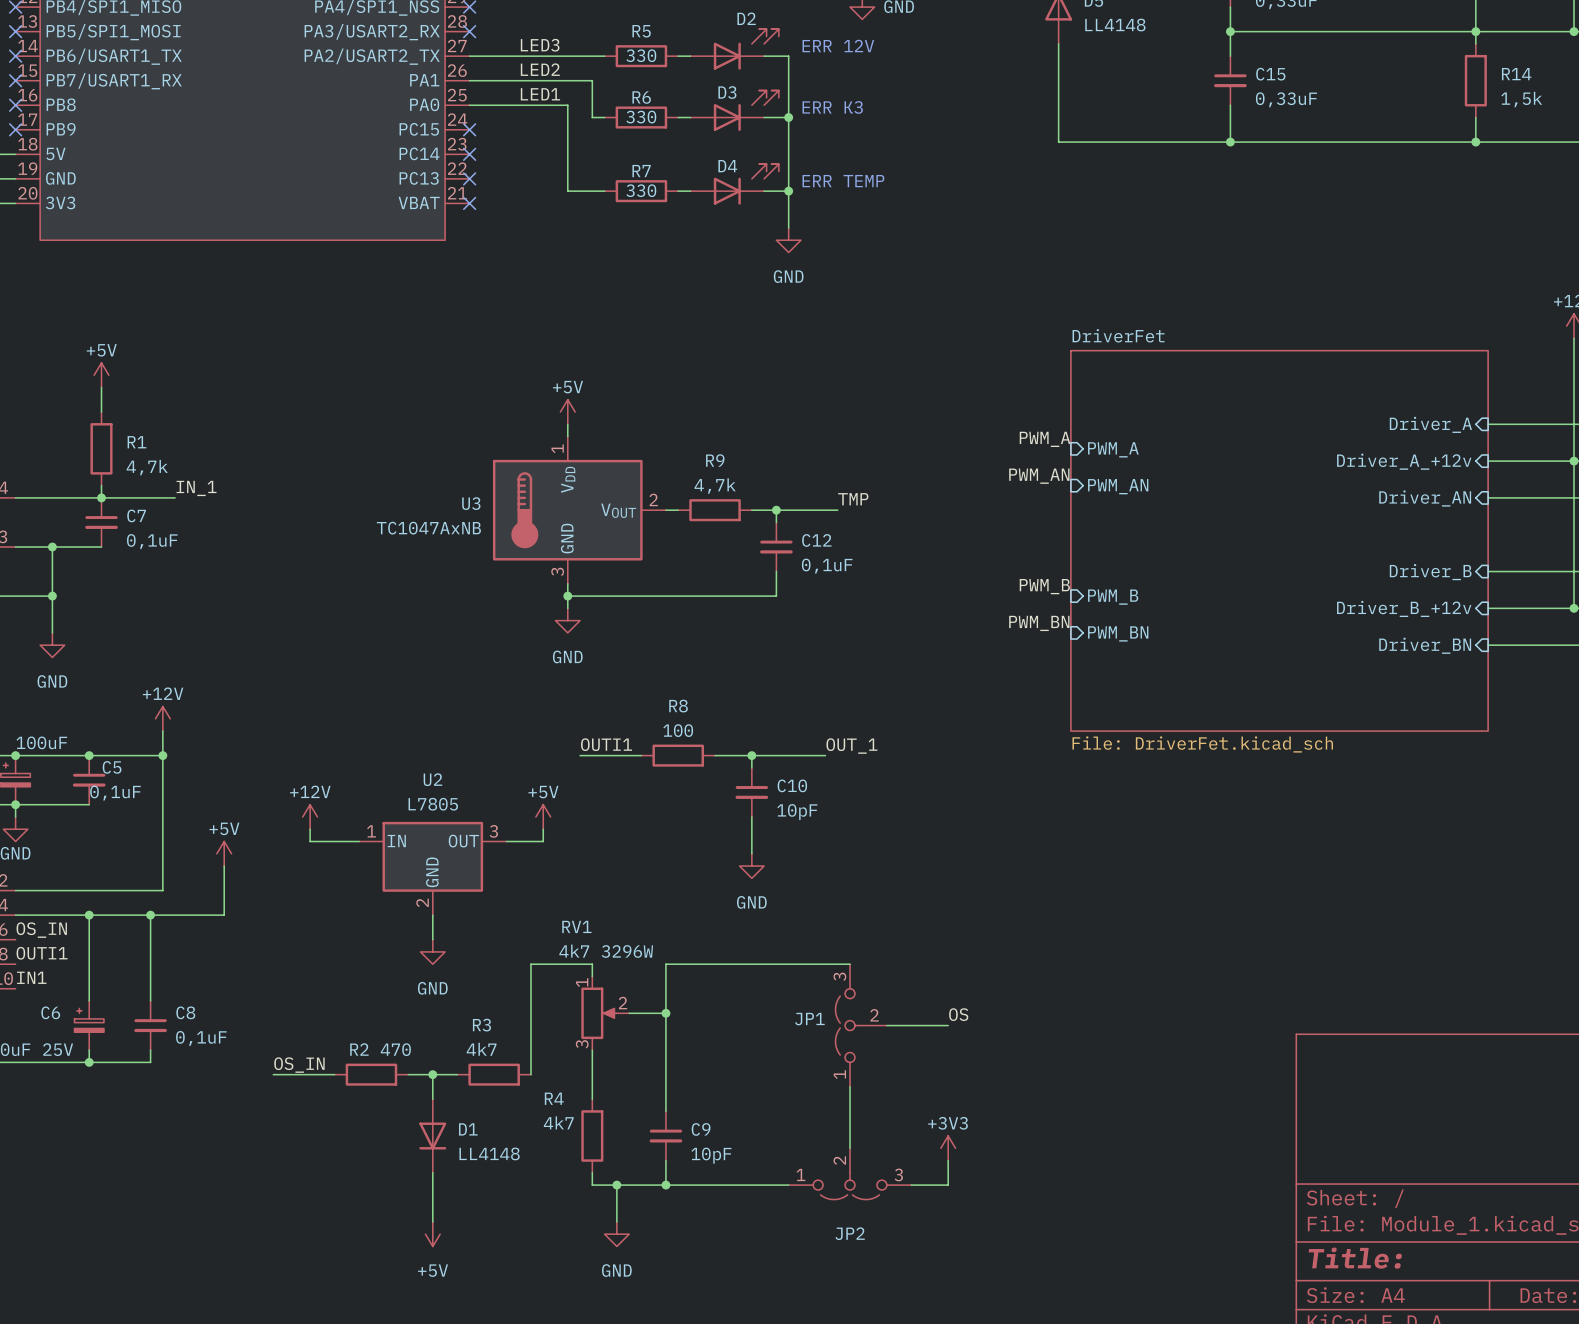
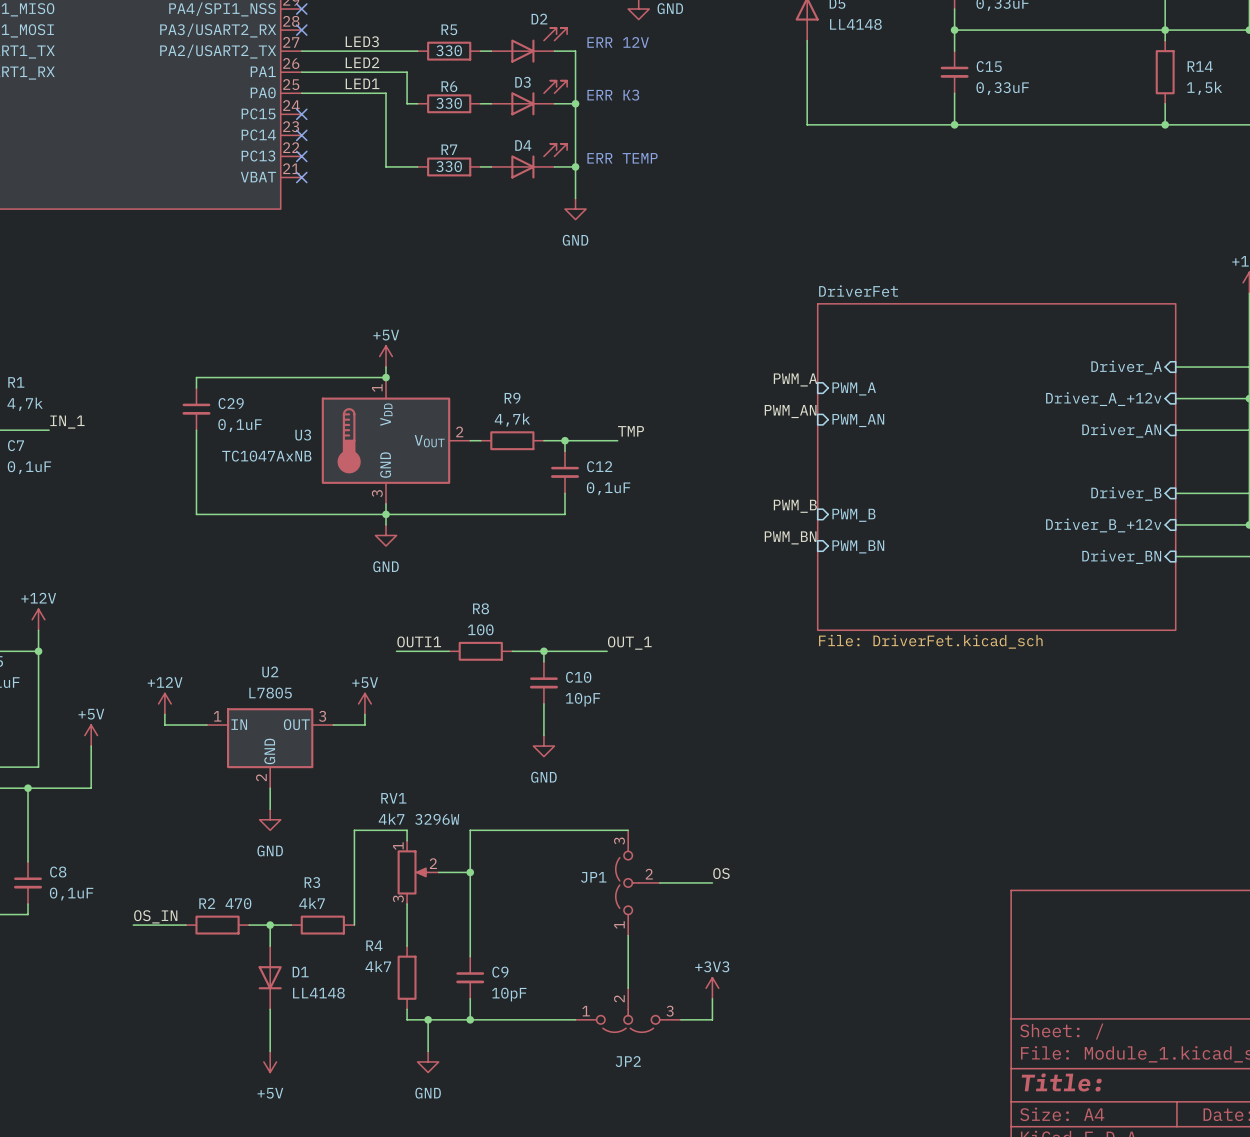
wire: none -> (386, 377) (196, 377) (196, 388)
junction: none -> (386, 377)
C29: none -> 0,1uF (196, 409)
wire: none -> (196, 430) (196, 514) (386, 514)

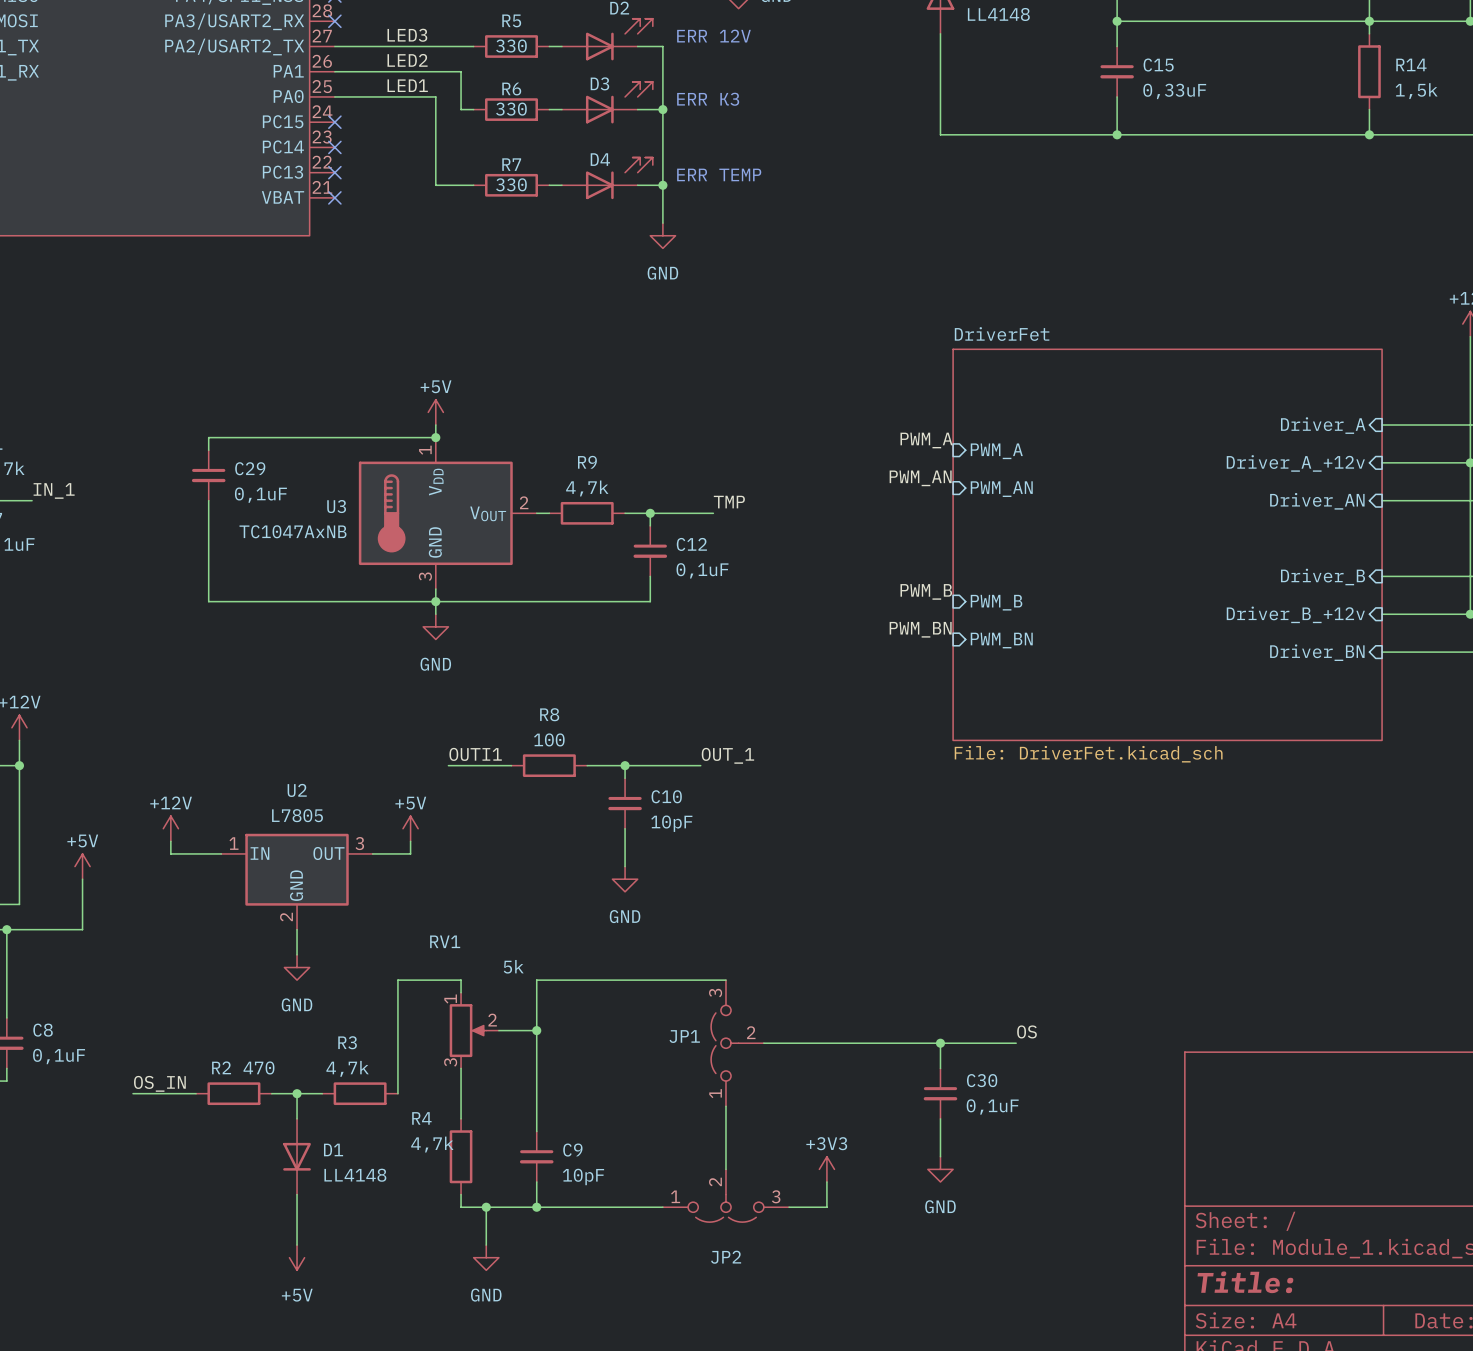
RV1 value: 4k7 3296W (418, 819) -> 5k (513, 966)
label position: OS (721, 873) -> OS (1027, 1031)
wire: none -> (826, 1043) (1016, 1043)
wire: none -> (940, 1043) (940, 1068)
junction: none -> (940, 1043)
R3 value: 4k7 (312, 903) -> 4,7k (347, 1068)
C30: none -> 0,1uF (940, 1093)
wire: none -> (940, 1118) (940, 1156)
R4 value: 4k7 (378, 966) -> 4,7k (432, 1144)
power symbol: none -> GND (940, 1169)

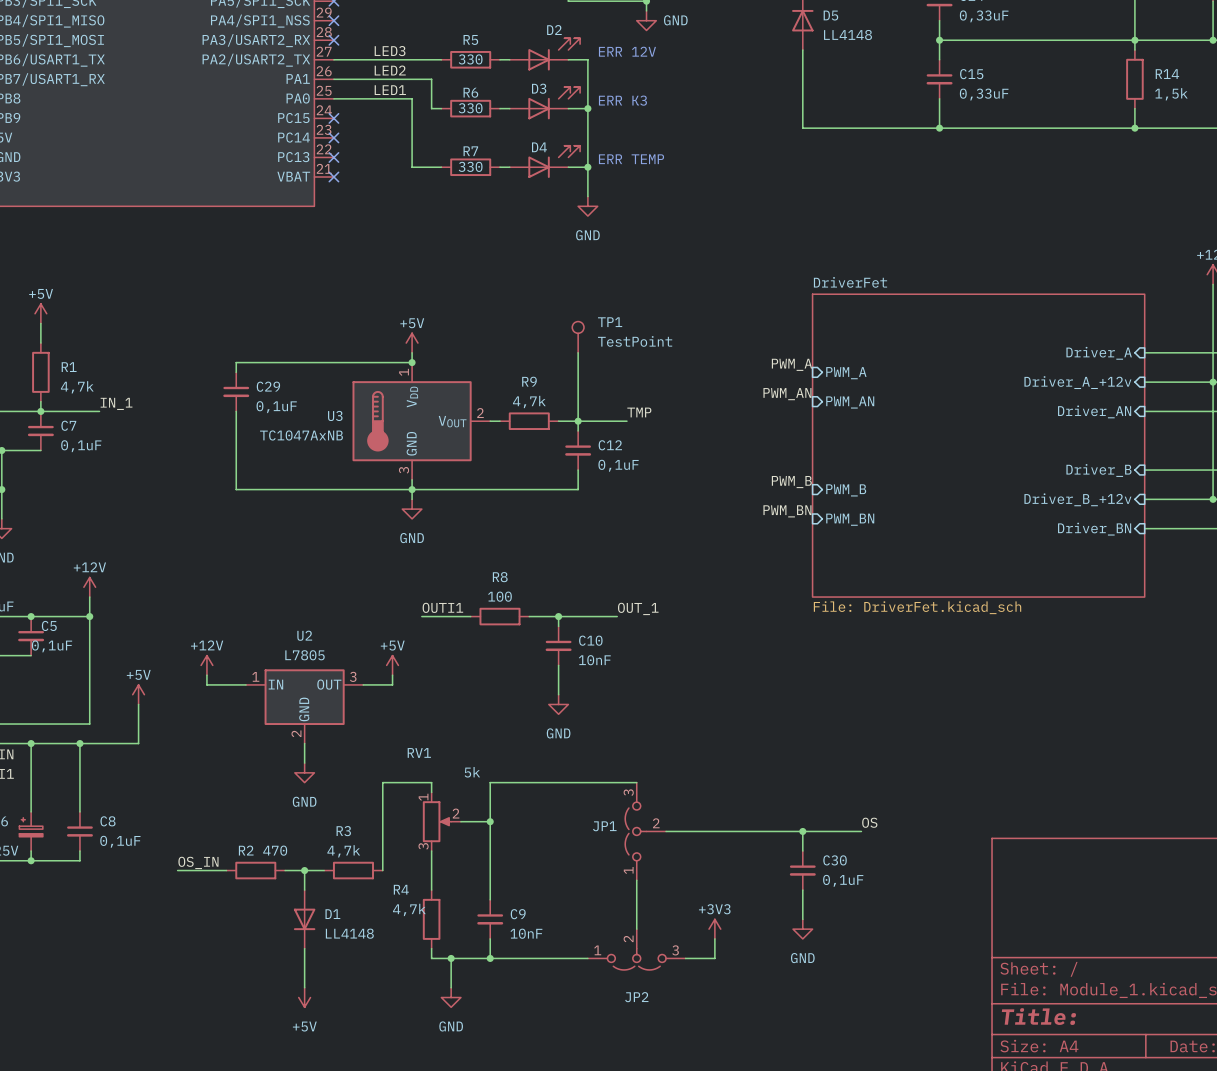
TP1: none -> TestPoint (578, 337)
wire: none -> (578, 352) (578, 421)
C10 value: 10pF (671, 823) -> 10nF (594, 660)
C9 value: 10pF (583, 1176) -> 10nF (526, 933)

